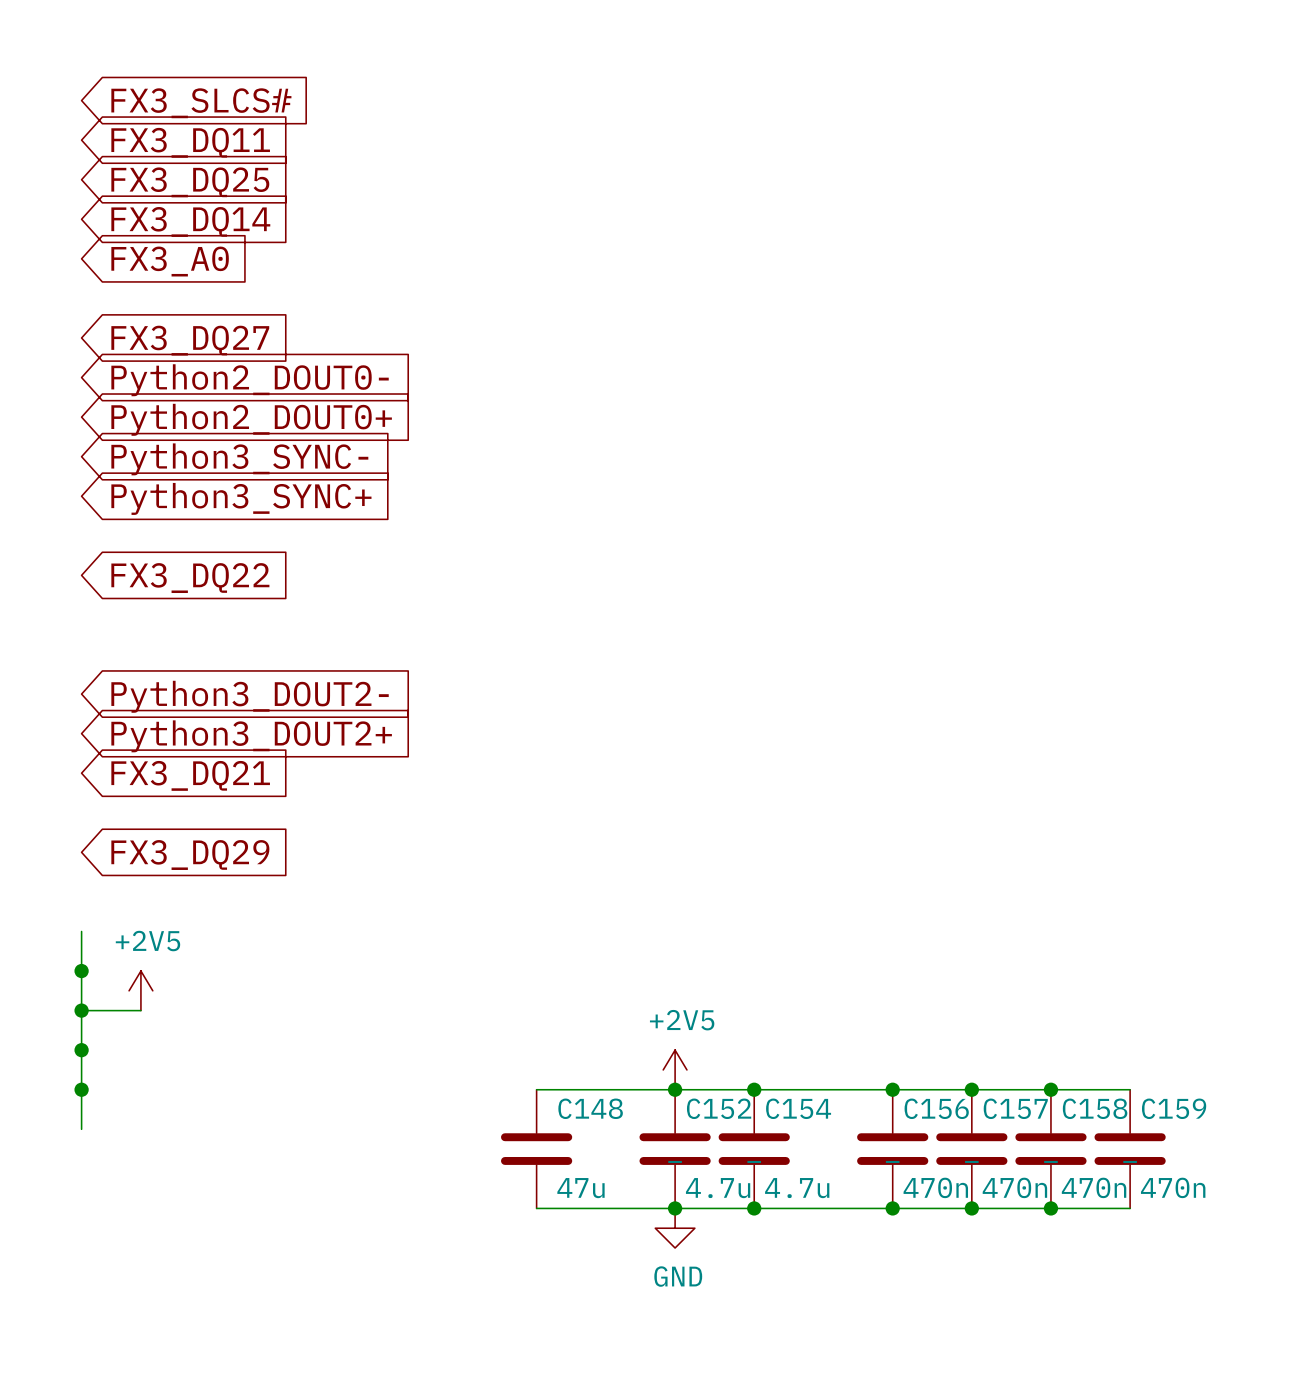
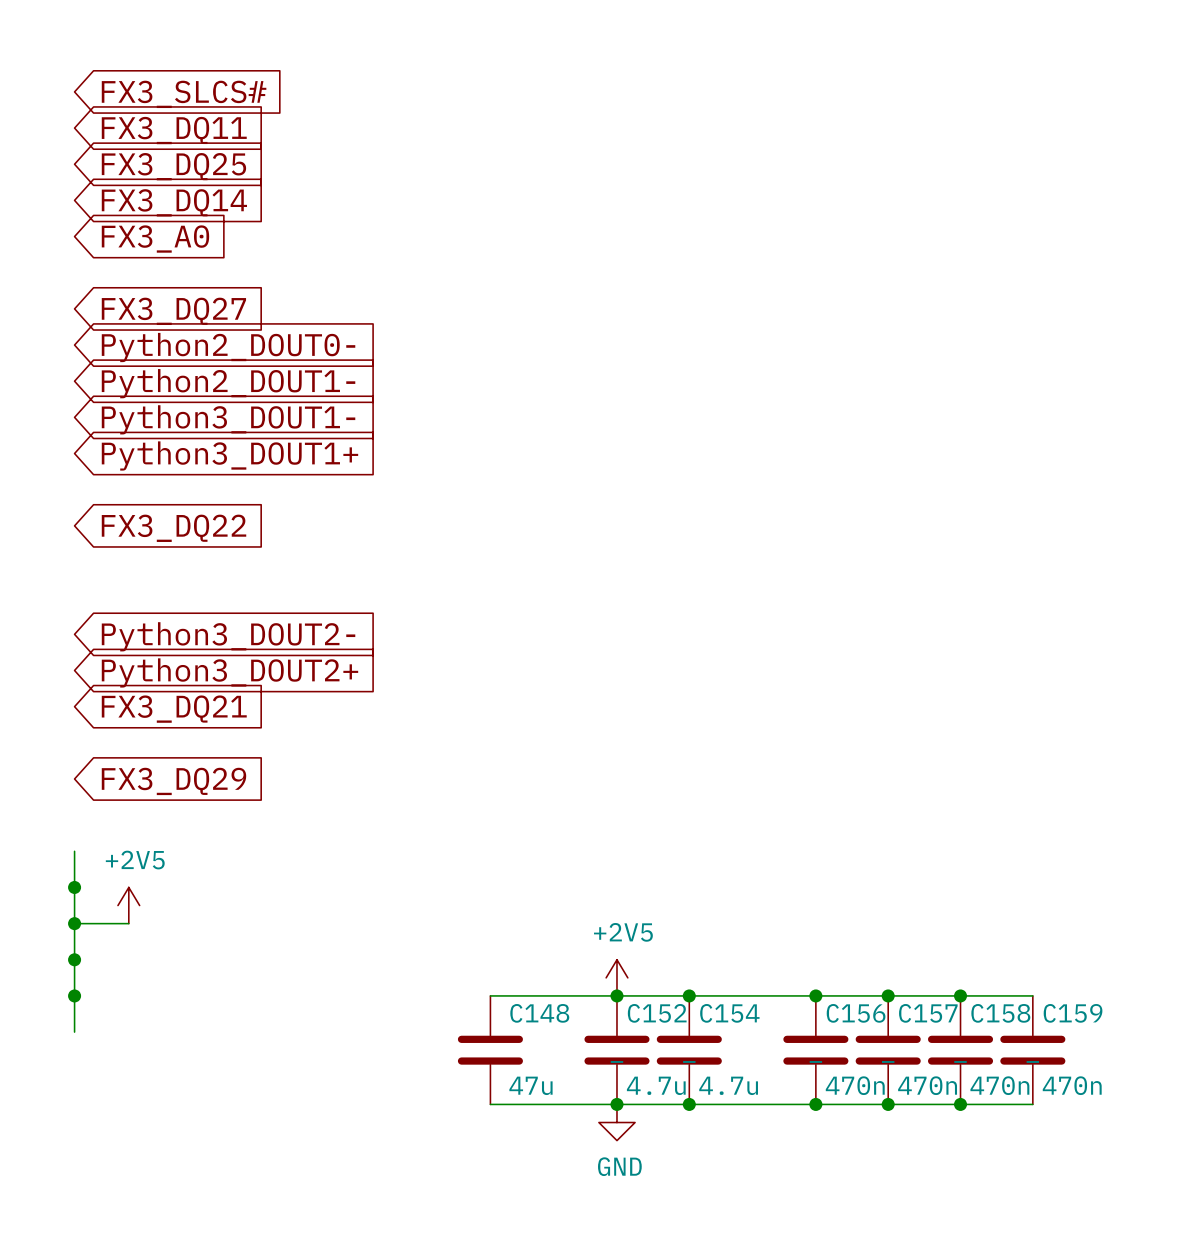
global label: Python2_DOUT0+ (251, 419) -> Python2_DOUT1- (228, 383)
global label: Python3_SYNC- (239, 459) -> Python3_DOUT1- (228, 419)
global label: Python3_SYNC+ (241, 498) -> Python3_DOUT1+ (229, 455)

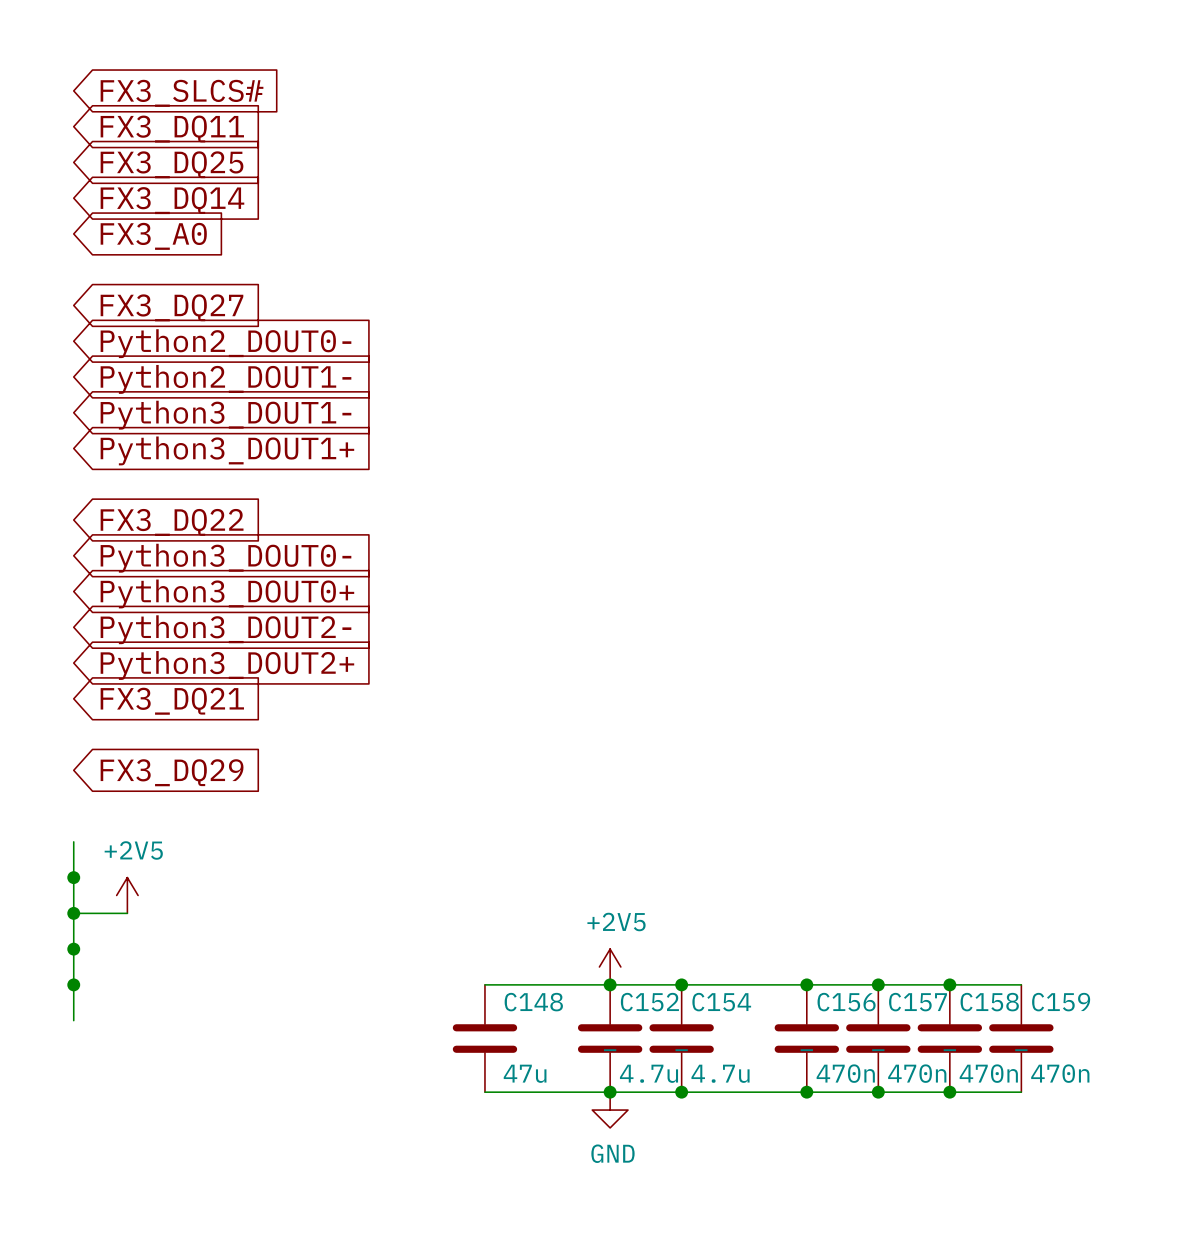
global label: none -> Python3_DOUT0- (225, 558)
global label: none -> Python3_DOUT0+ (227, 593)

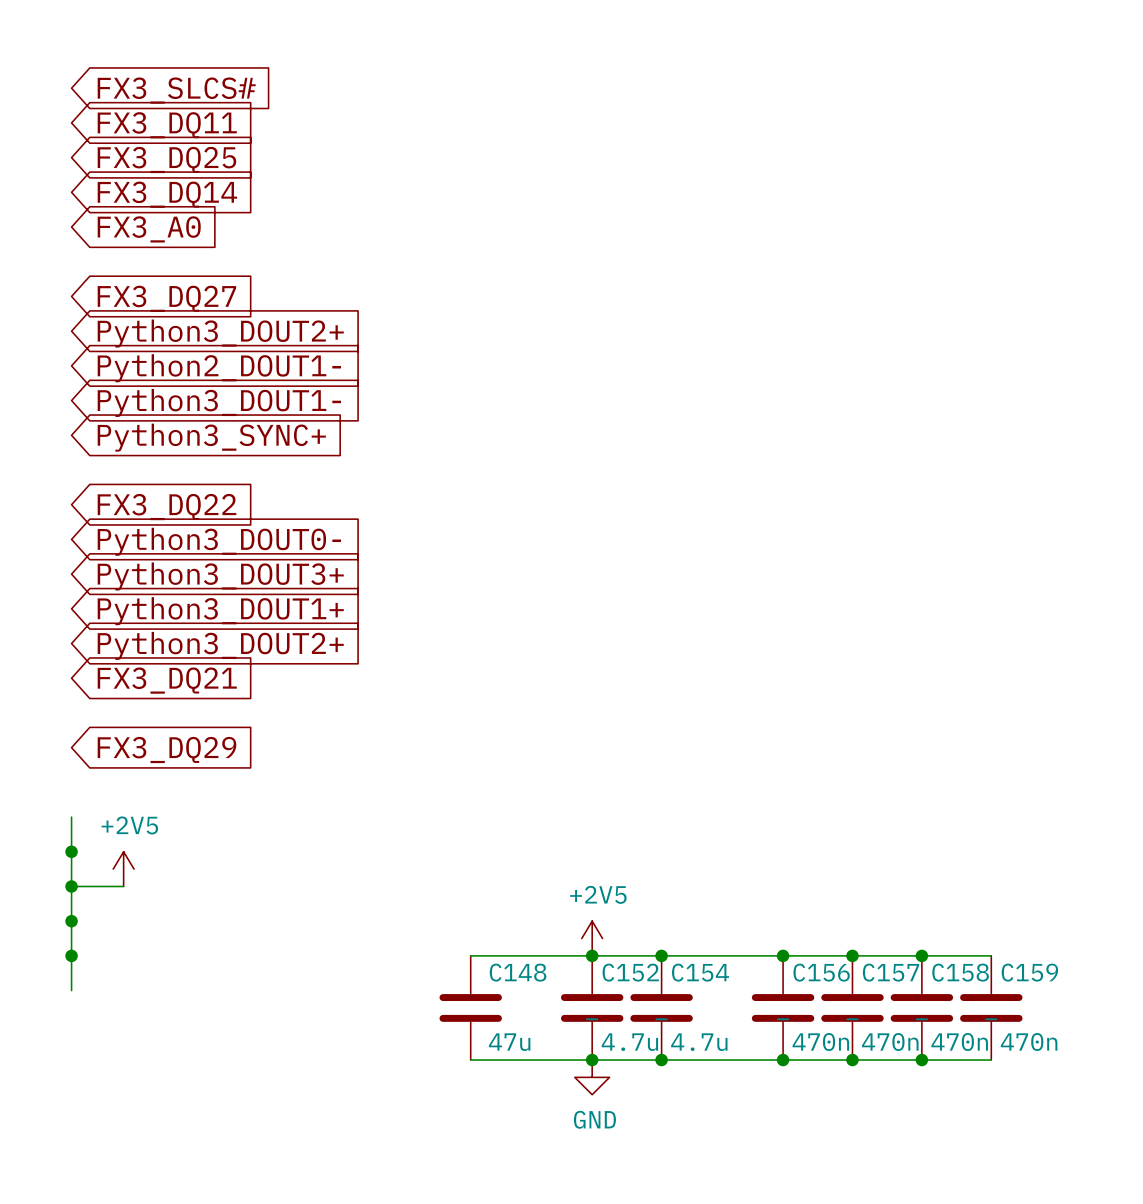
global label: Python2_DOUT0- (225, 343) -> Python3_DOUT2+ (220, 333)
global label: Python3_DOUT1+ (227, 450) -> Python3_SYNC+ (211, 437)
global label: Python3_DOUT0+ (227, 593) -> Python3_DOUT3+ (220, 576)
global label: Python3_DOUT2- (225, 629) -> Python3_DOUT1+ (220, 611)

